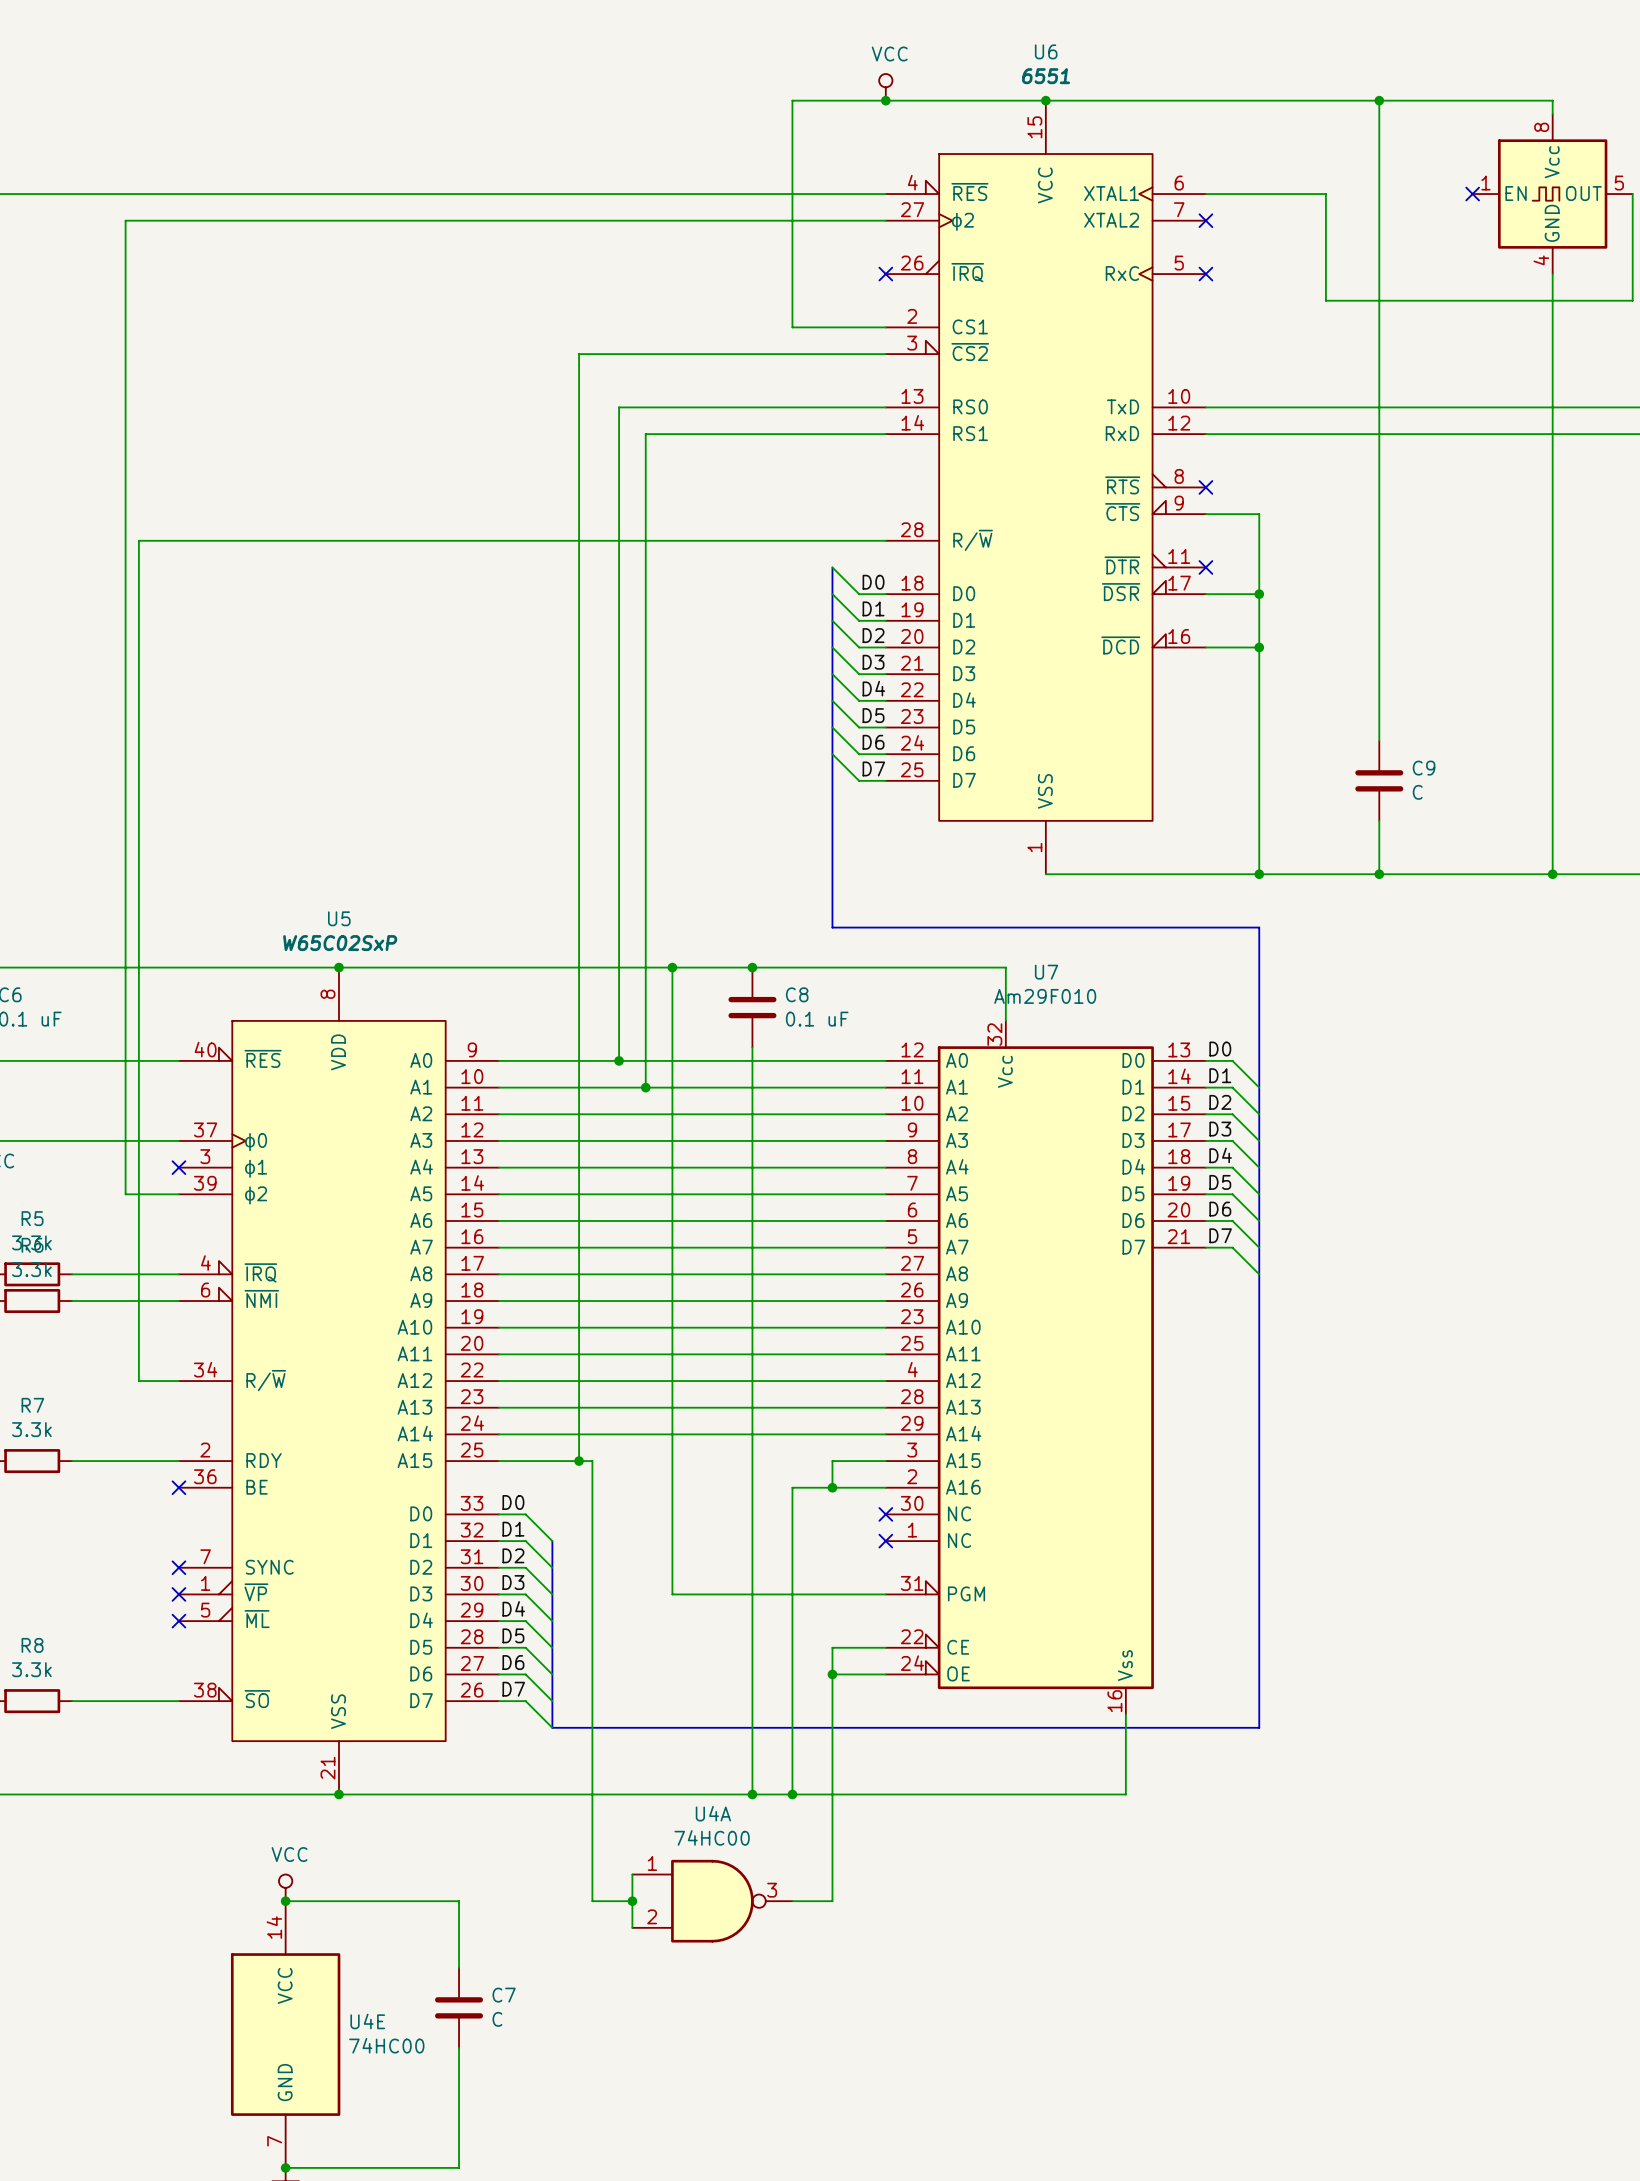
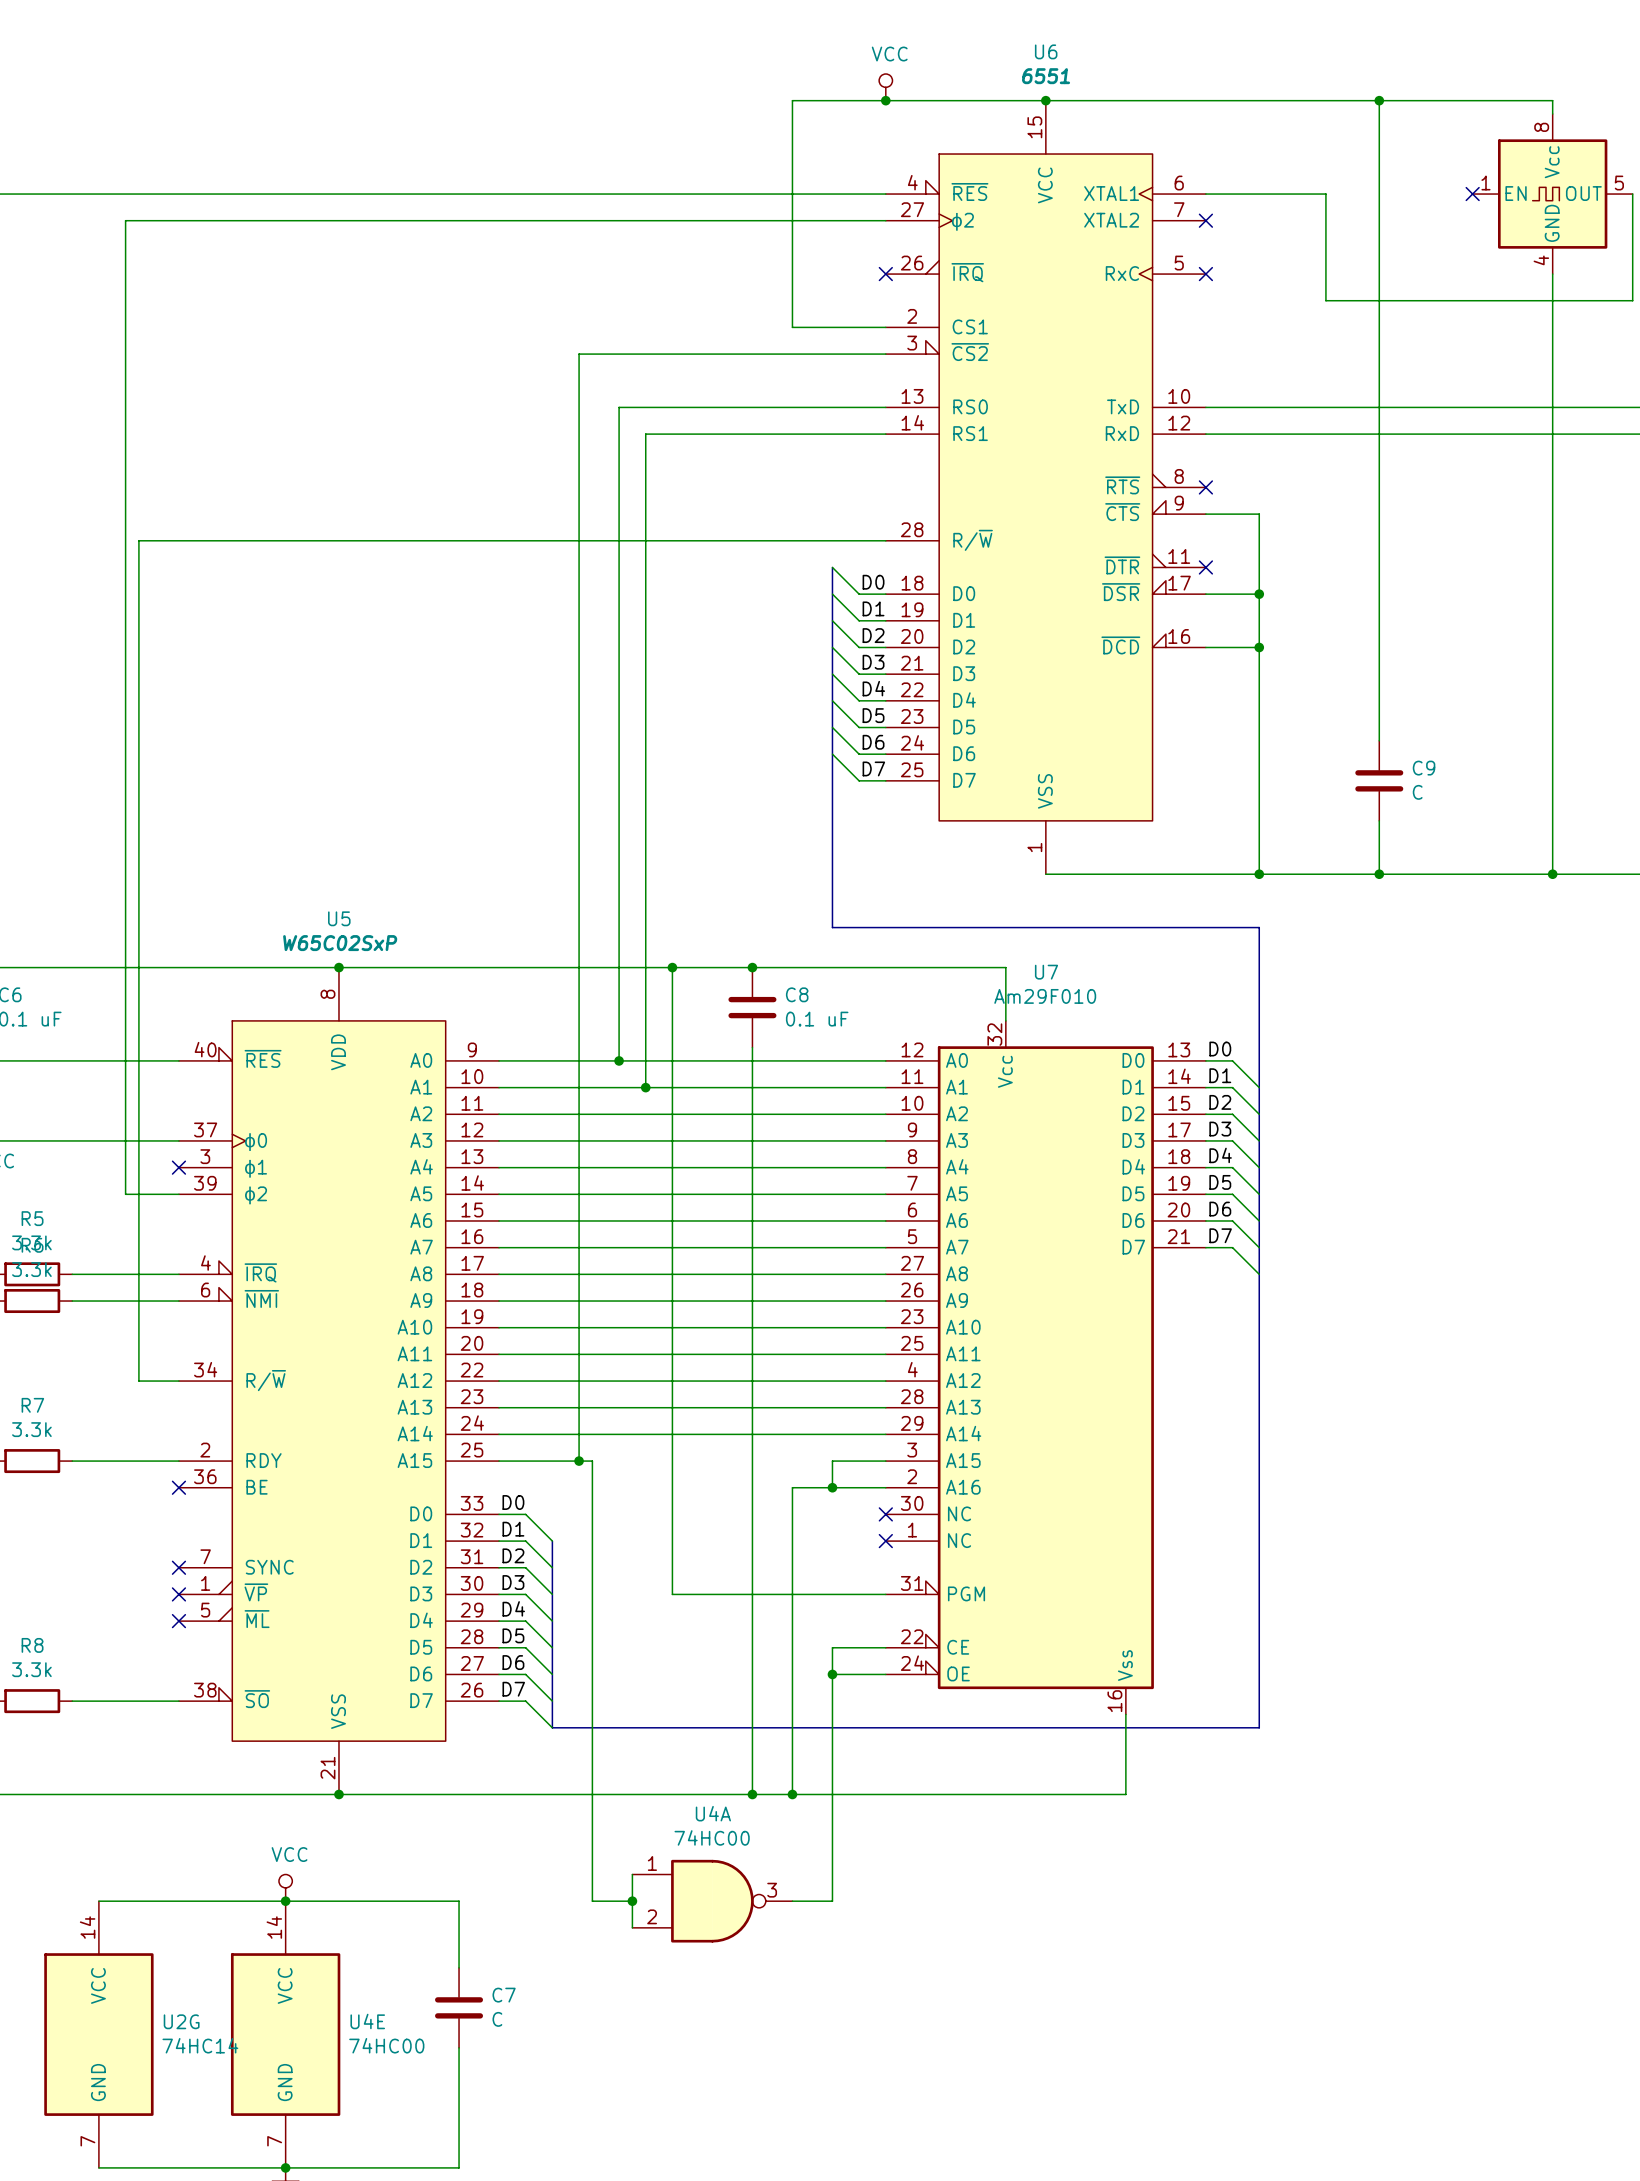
wire: none -> (98, 1901) (285, 1901)
U2G: none -> 74HC14 (98, 2034)
wire: none -> (98, 2167) (285, 2167)

